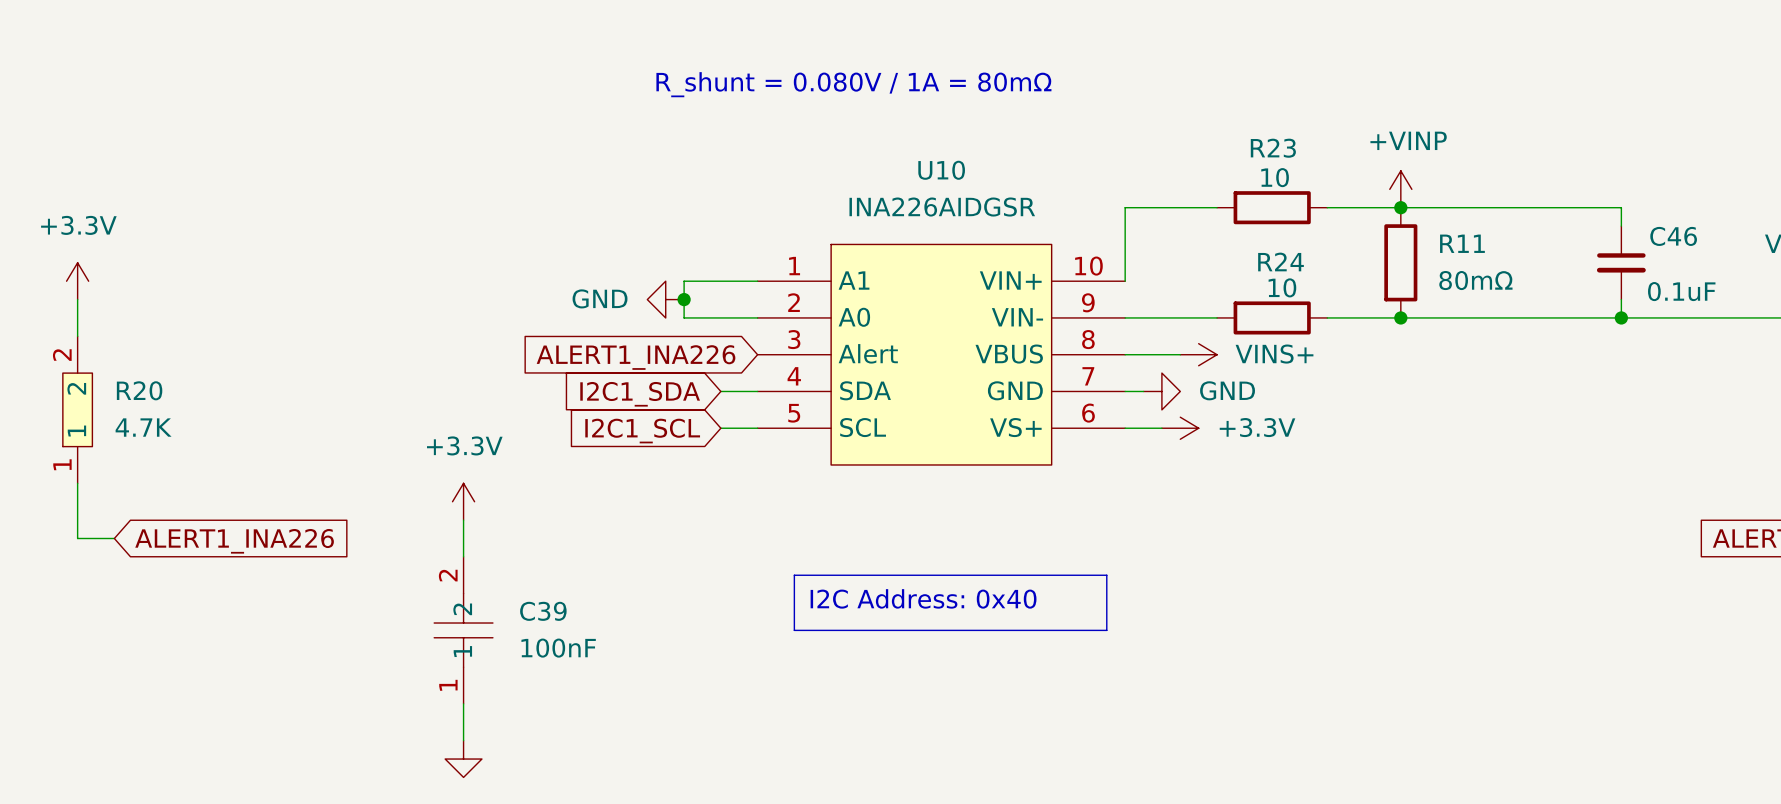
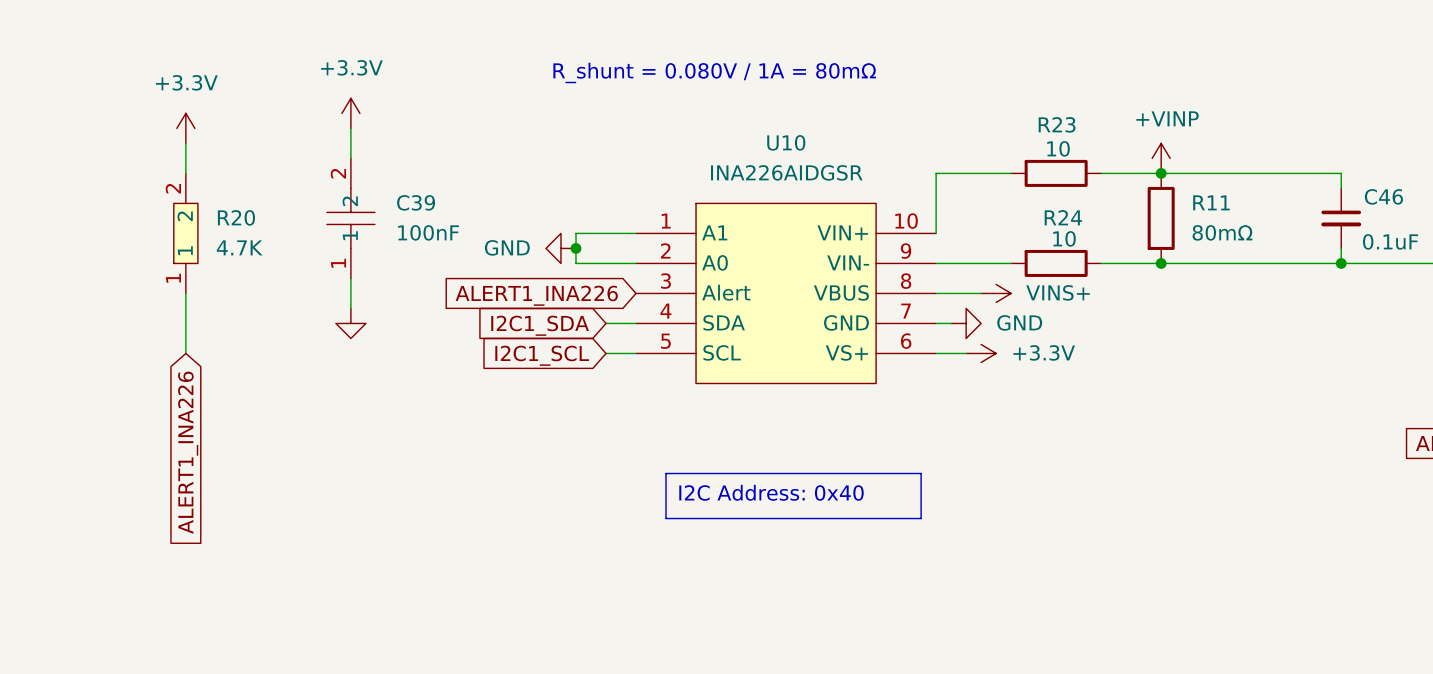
power symbol: none -> +3.3V (350, 113)
power symbol: none -> +3.3V (185, 128)
wire: none -> (350, 128) (350, 158)
power symbol: +3.3V (77, 281) -> none
wire: (77, 299) (77, 336) -> (185, 143) (185, 173)
wire: none -> (185, 293) (185, 353)
power symbol: none -> (350, 323)
R20 position: (77, 409) -> (185, 233)
wire: (77, 483) (77, 538) (114, 538) -> none
power symbol: +3.3V (463, 501) -> none
wire: (463, 520) (463, 556) -> (350, 278) (350, 308)
global label rotation: 0° (234, 541) -> 90° clockwise (188, 452)
C39 position: (463, 630) -> (350, 218)
wire: (463, 703) (463, 740) -> none
power symbol: (463, 759) -> none

